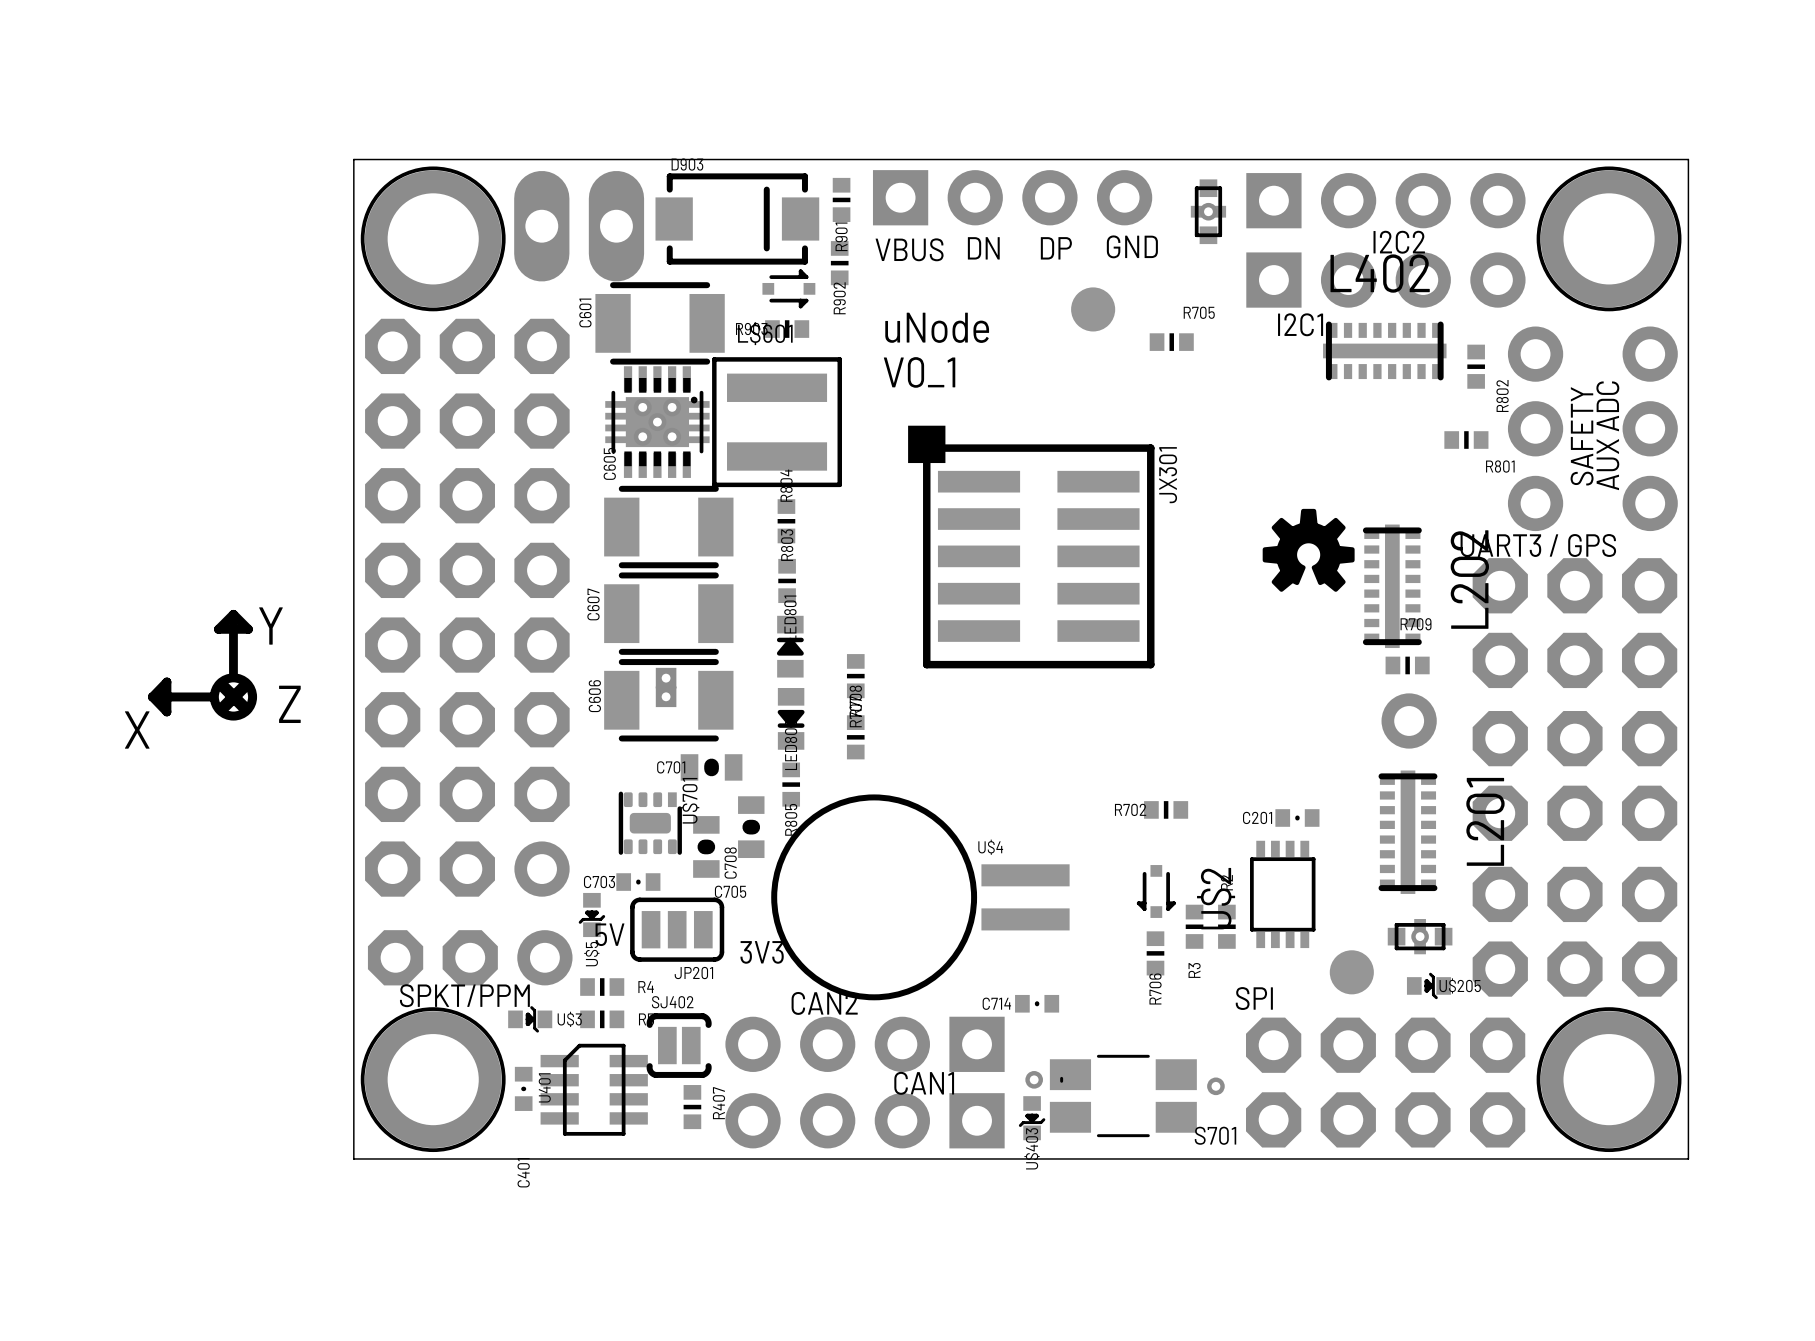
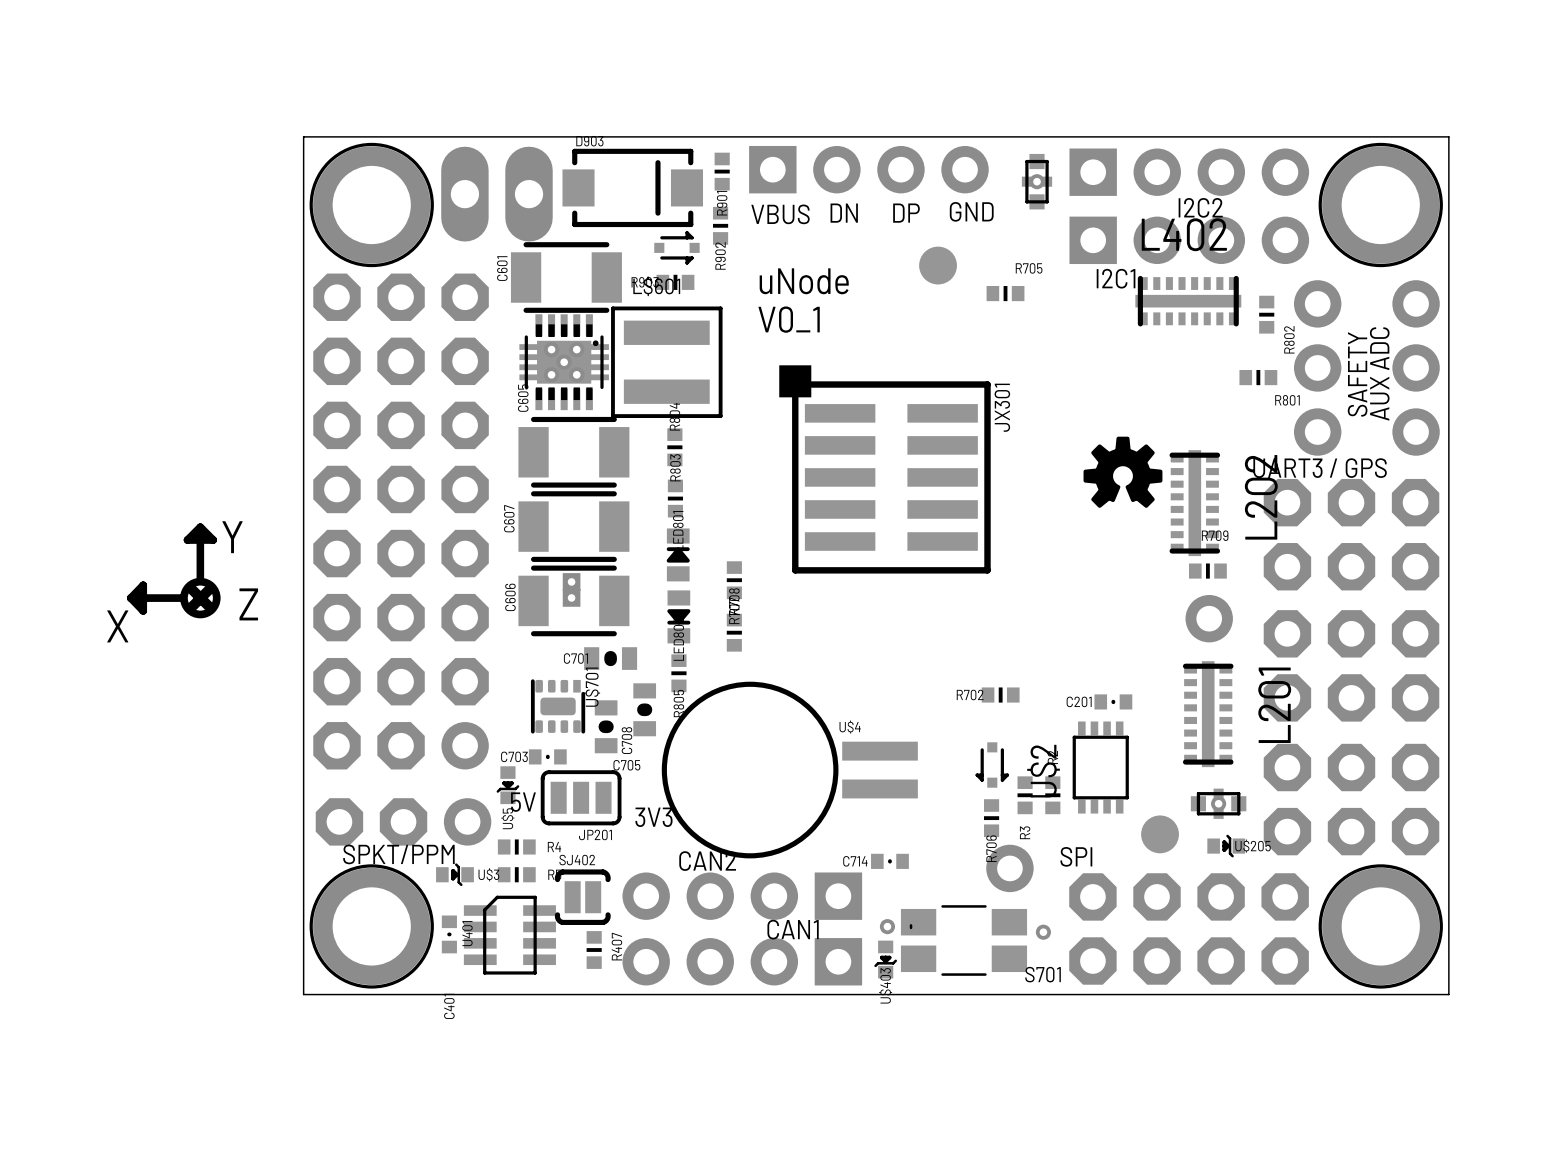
part: none -> (1009, 868)

